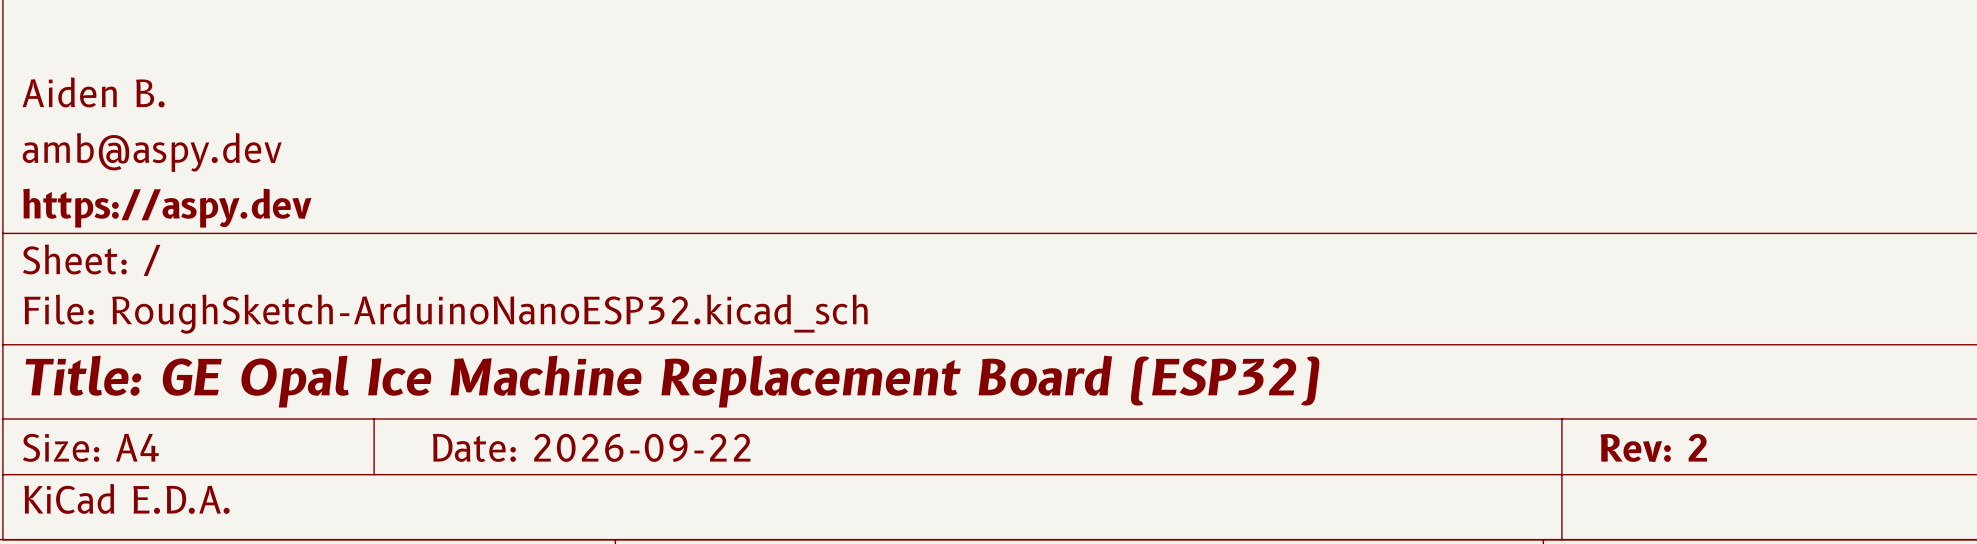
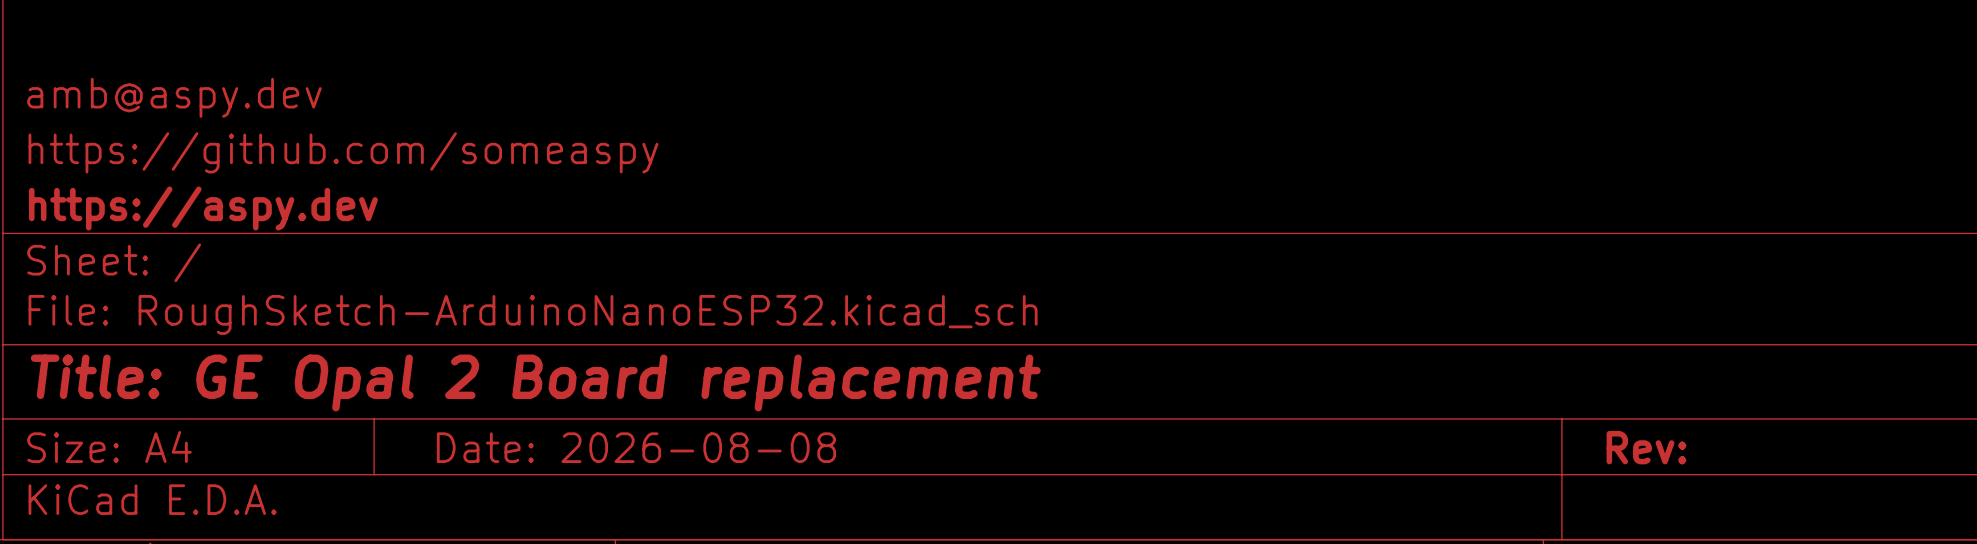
title block: Aiden B. (93, 92) -> amb@aspy.dev (174, 97)
title block: amb@aspy.dev (152, 152) -> https://github.com/someaspy (343, 152)
title block: Title: GE Opal Ice Machine Replacement Board (ESP32) (672, 381) -> Title: GE Opal 2 Board replacement (535, 382)
title block: Date: 2026-09-22 (591, 447) -> Date: 2026-08-08 (636, 447)
title block: Rev: 2 (1653, 447) -> Rev: (1646, 447)

